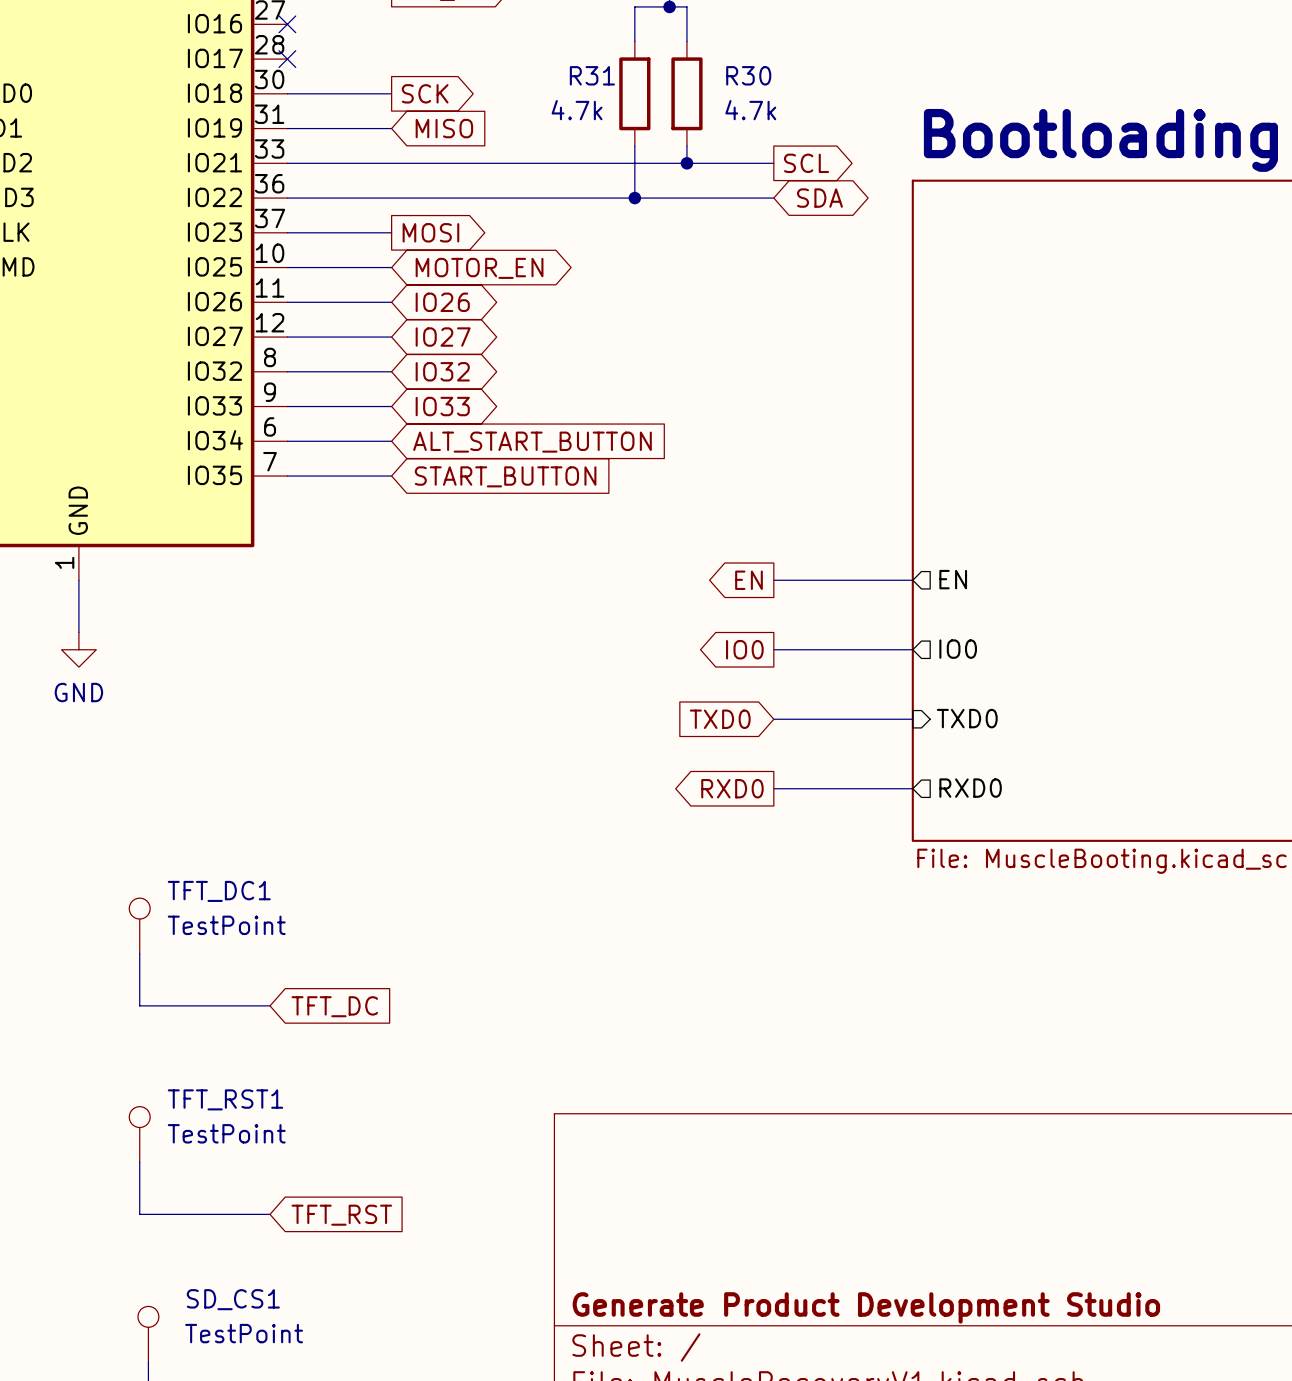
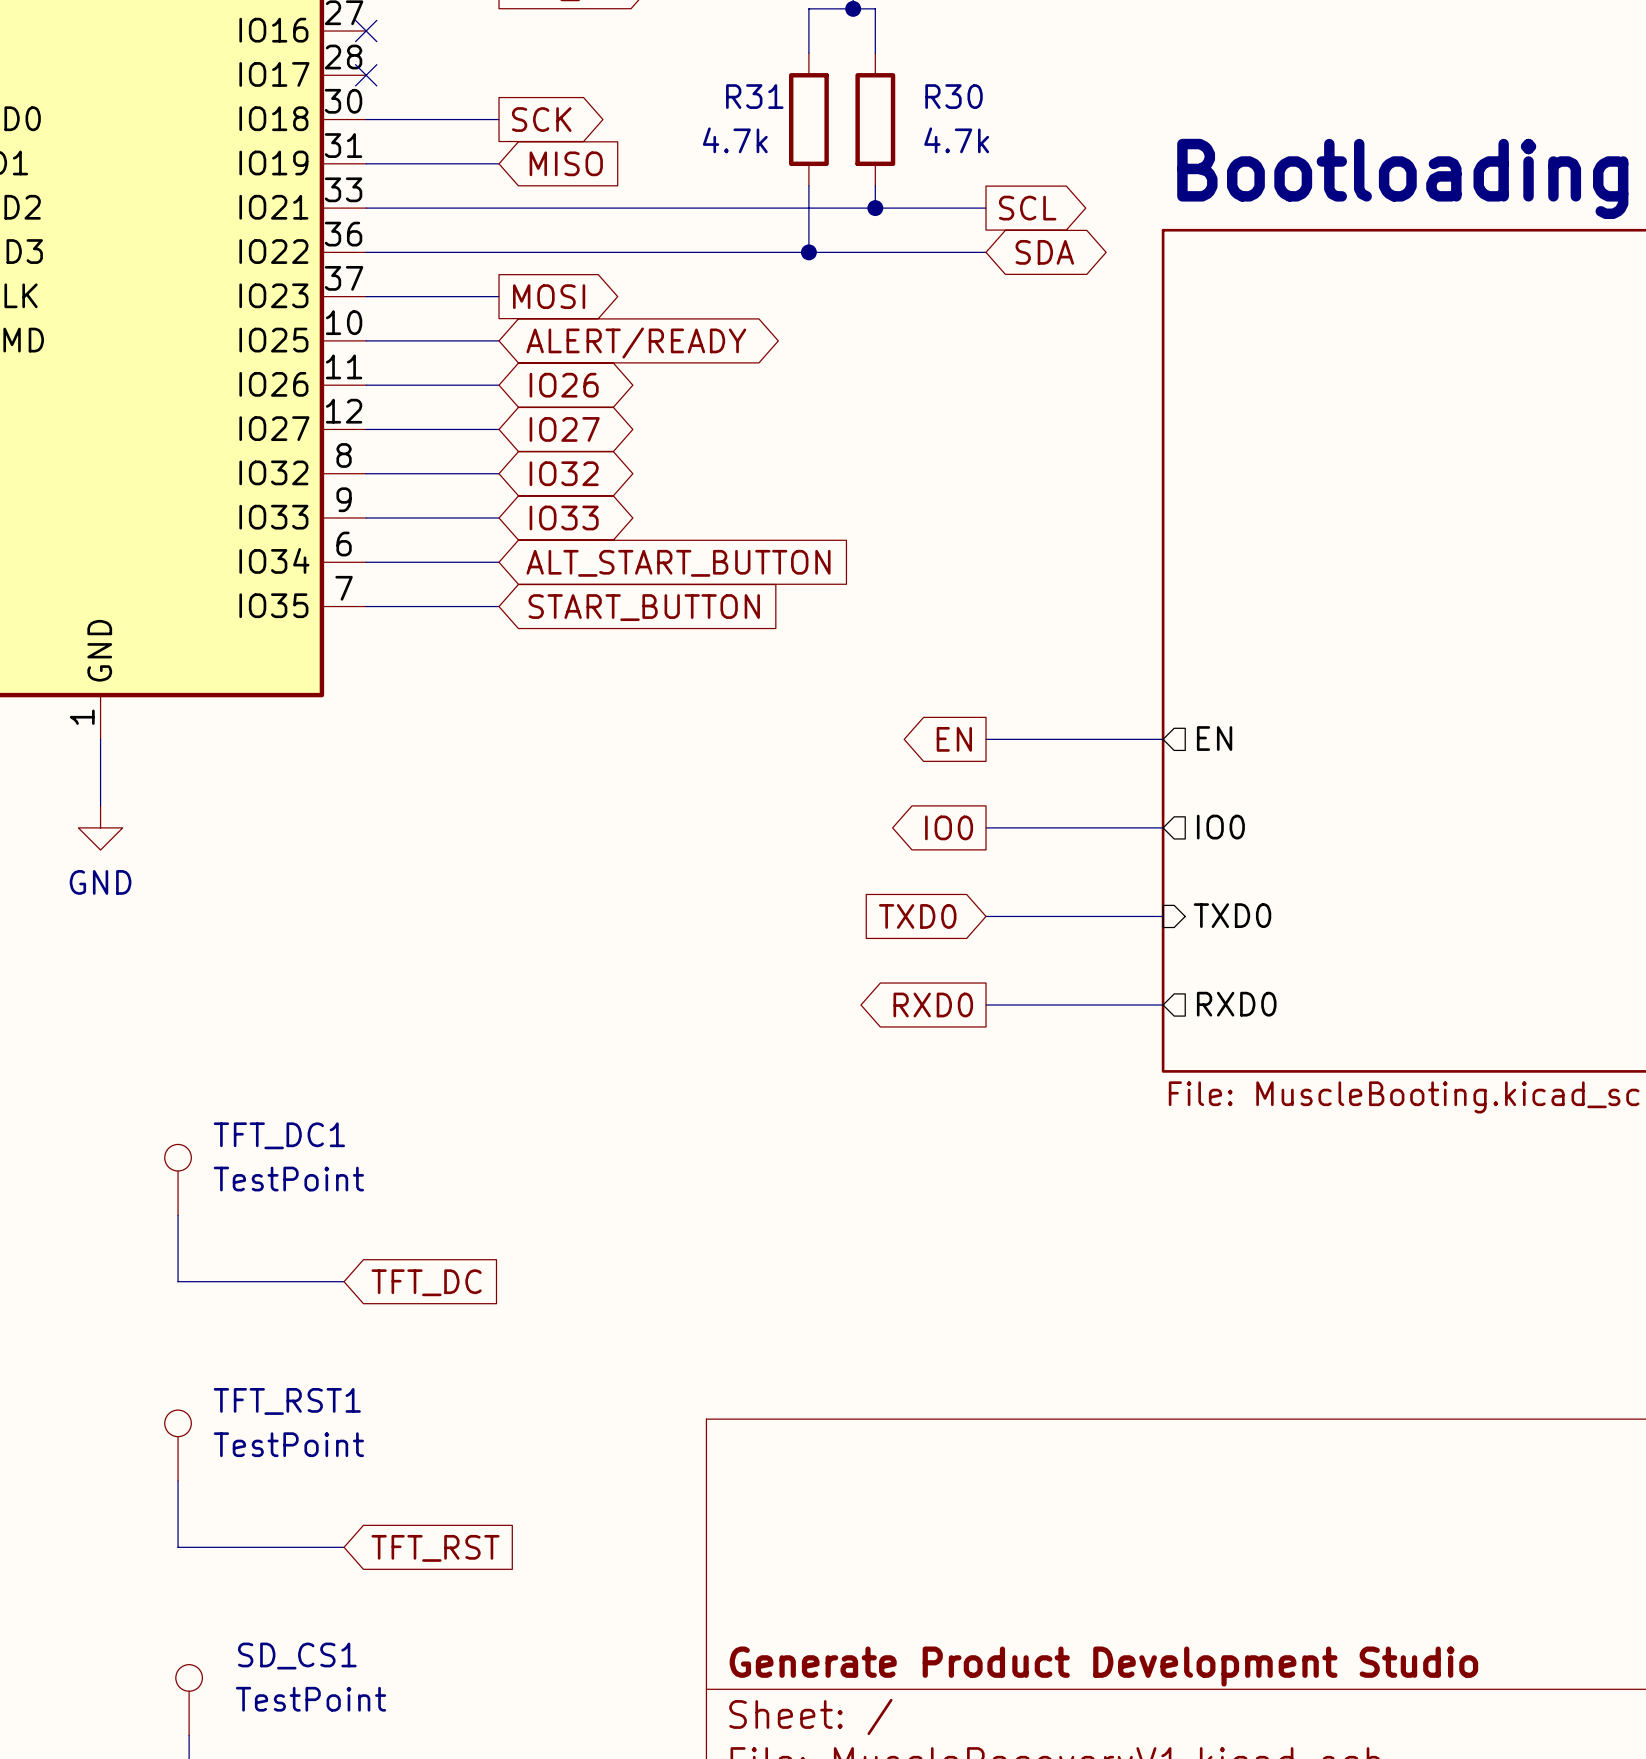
global label: MOTOR_EN (479, 268) -> ALERT/READY (636, 343)

